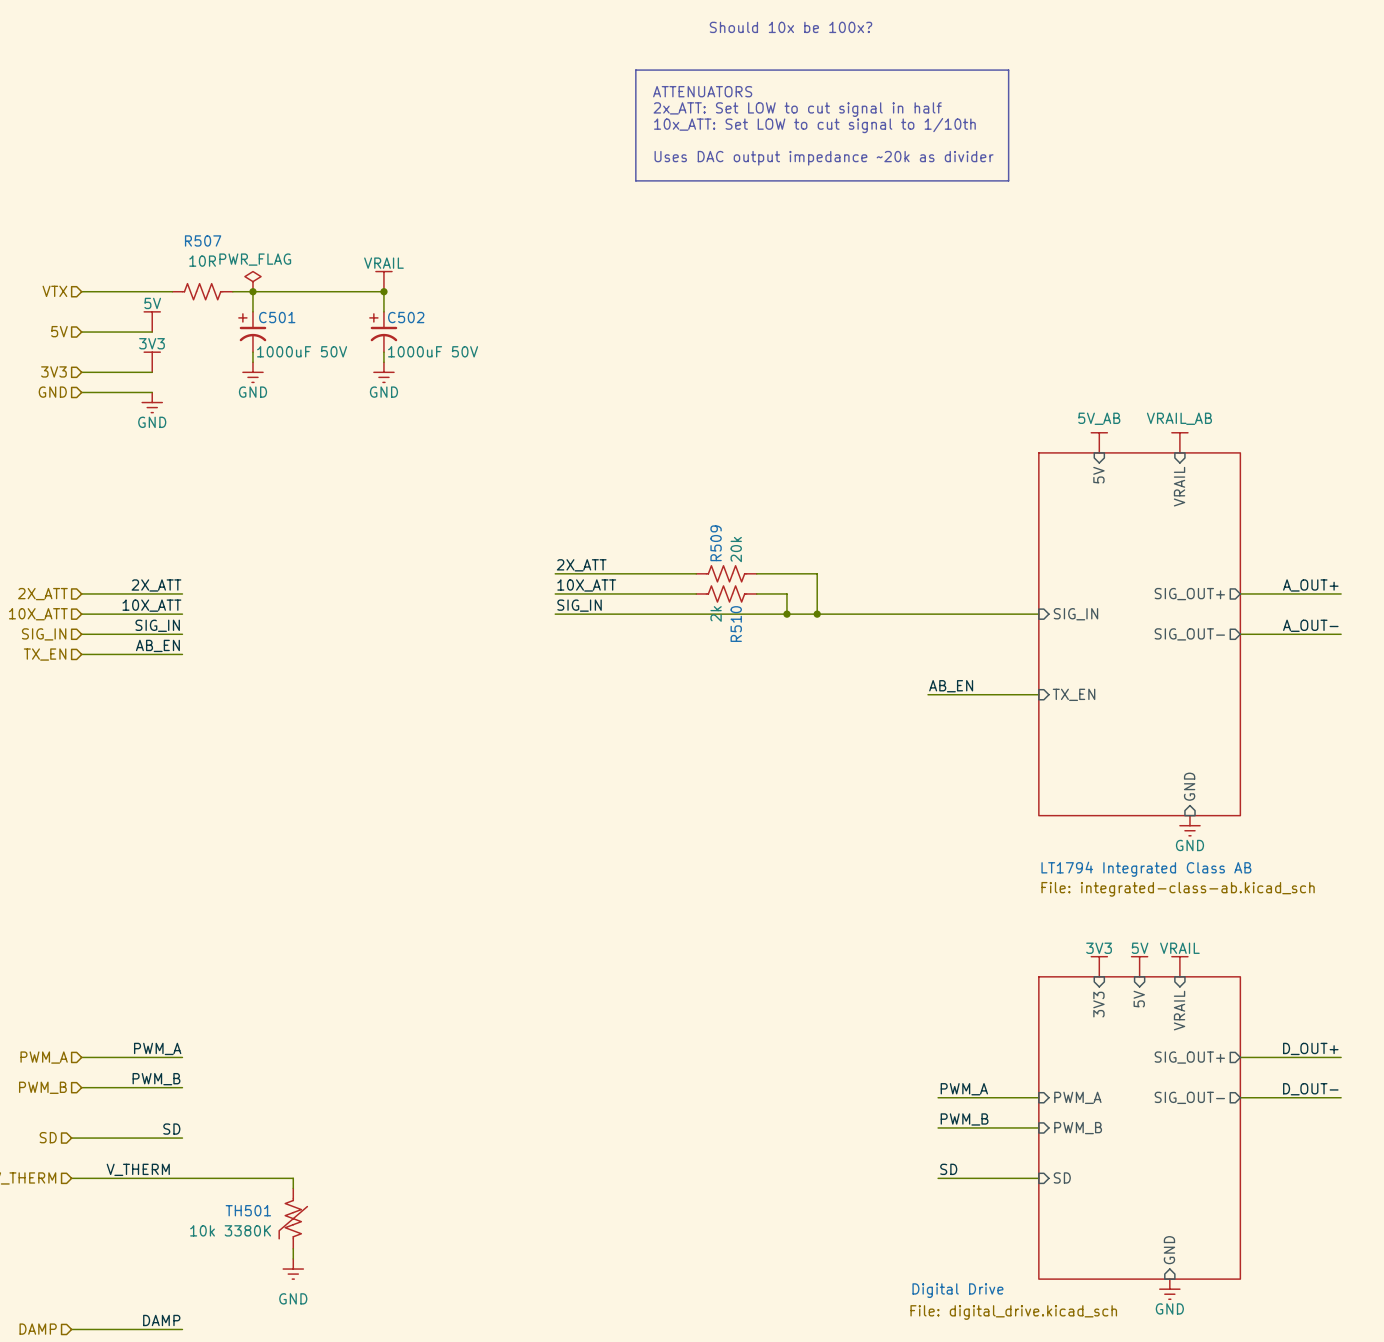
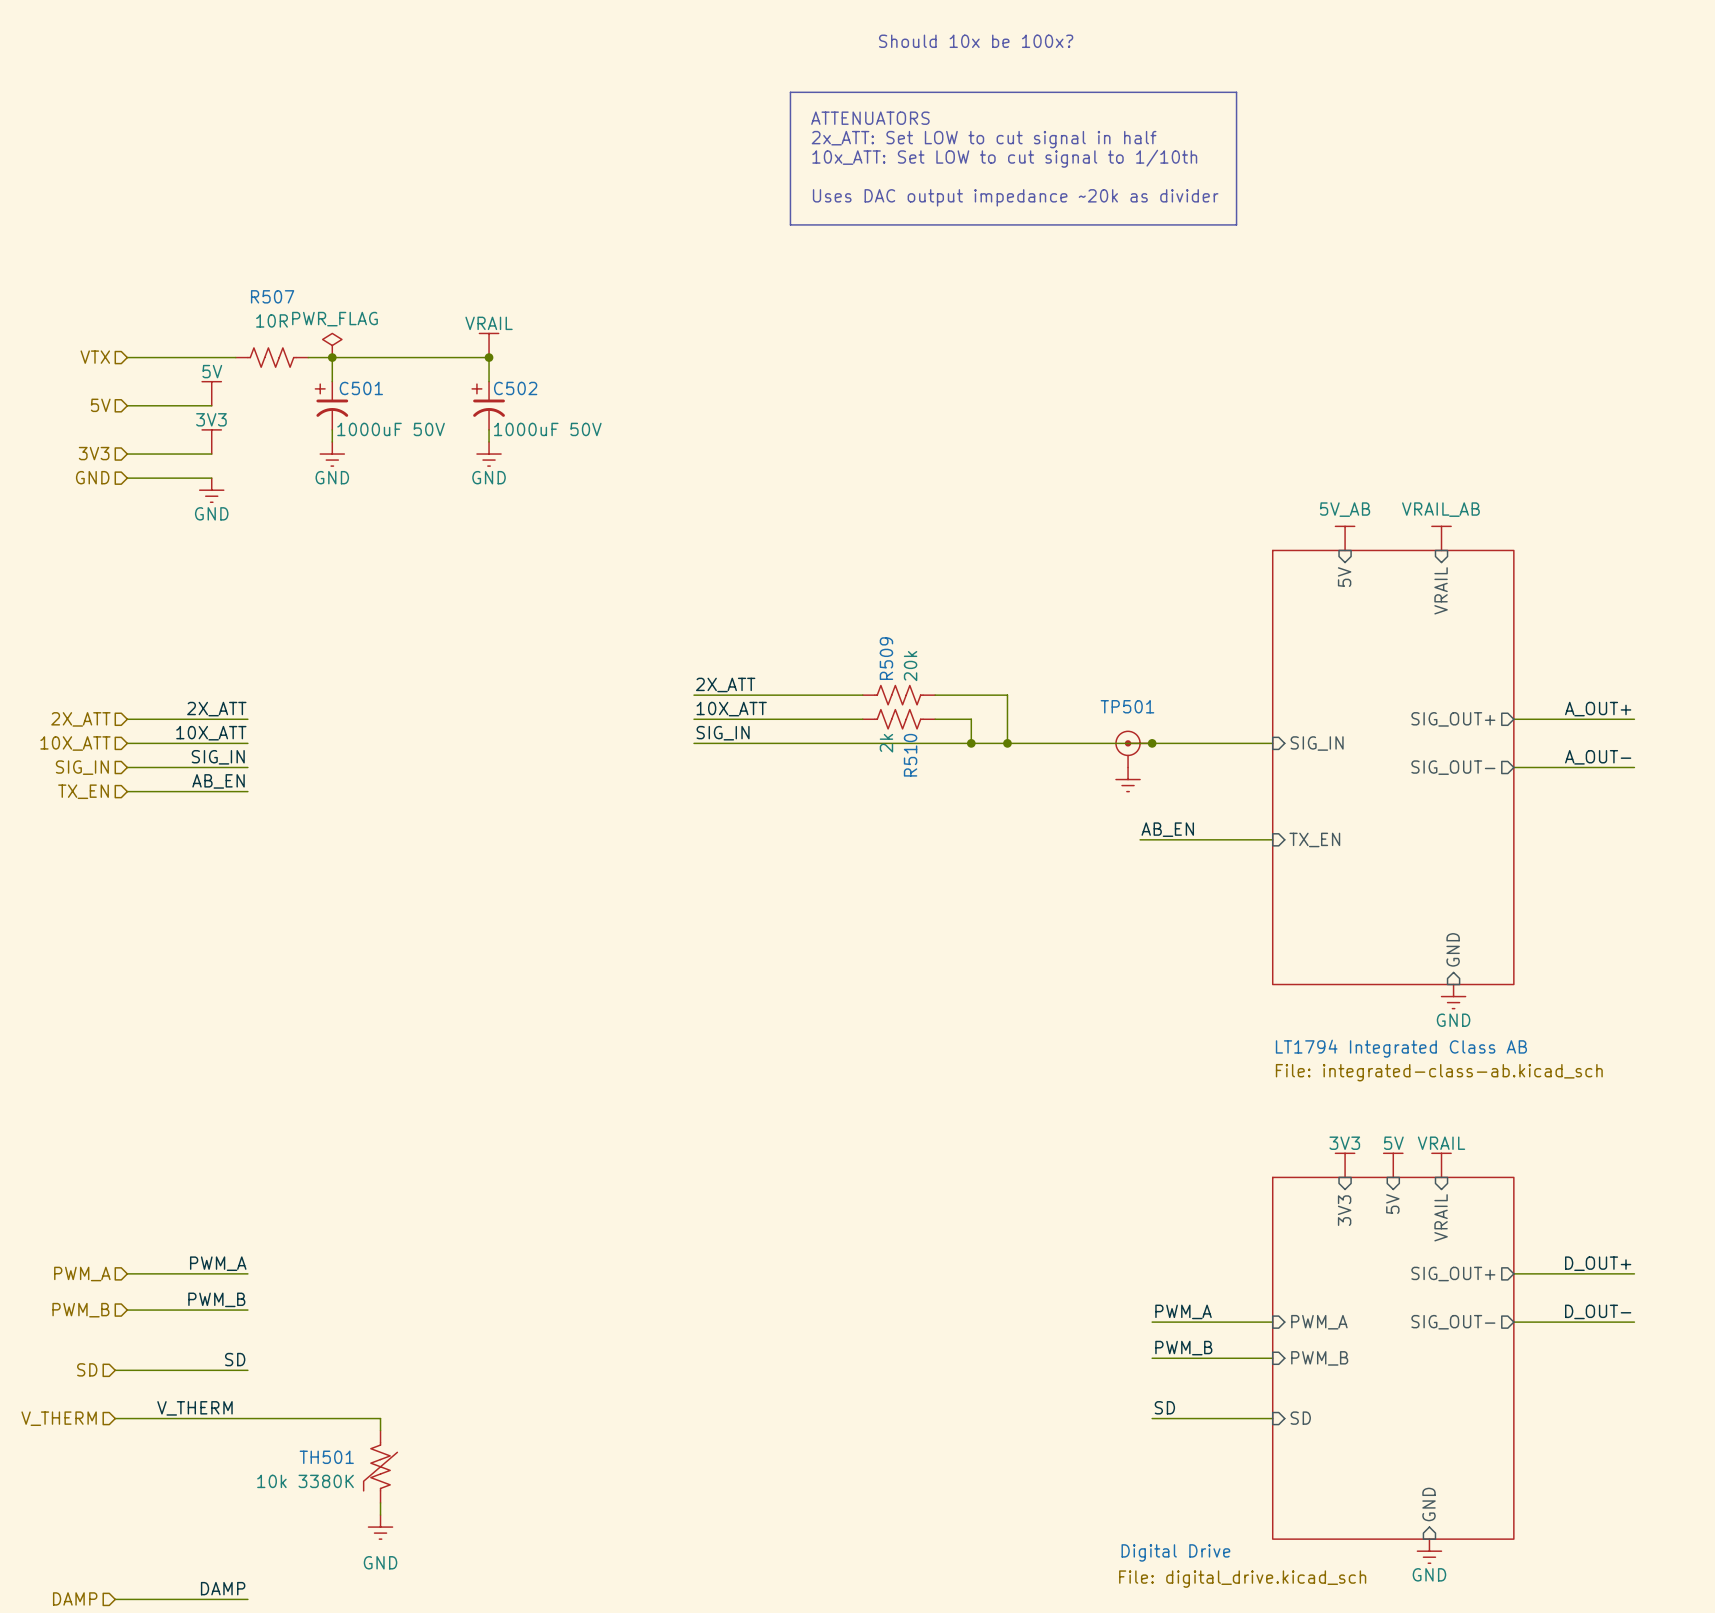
junction: none -> (1152, 743)
TP501: none -> (1134, 749)
power symbol: none -> (1128, 779)

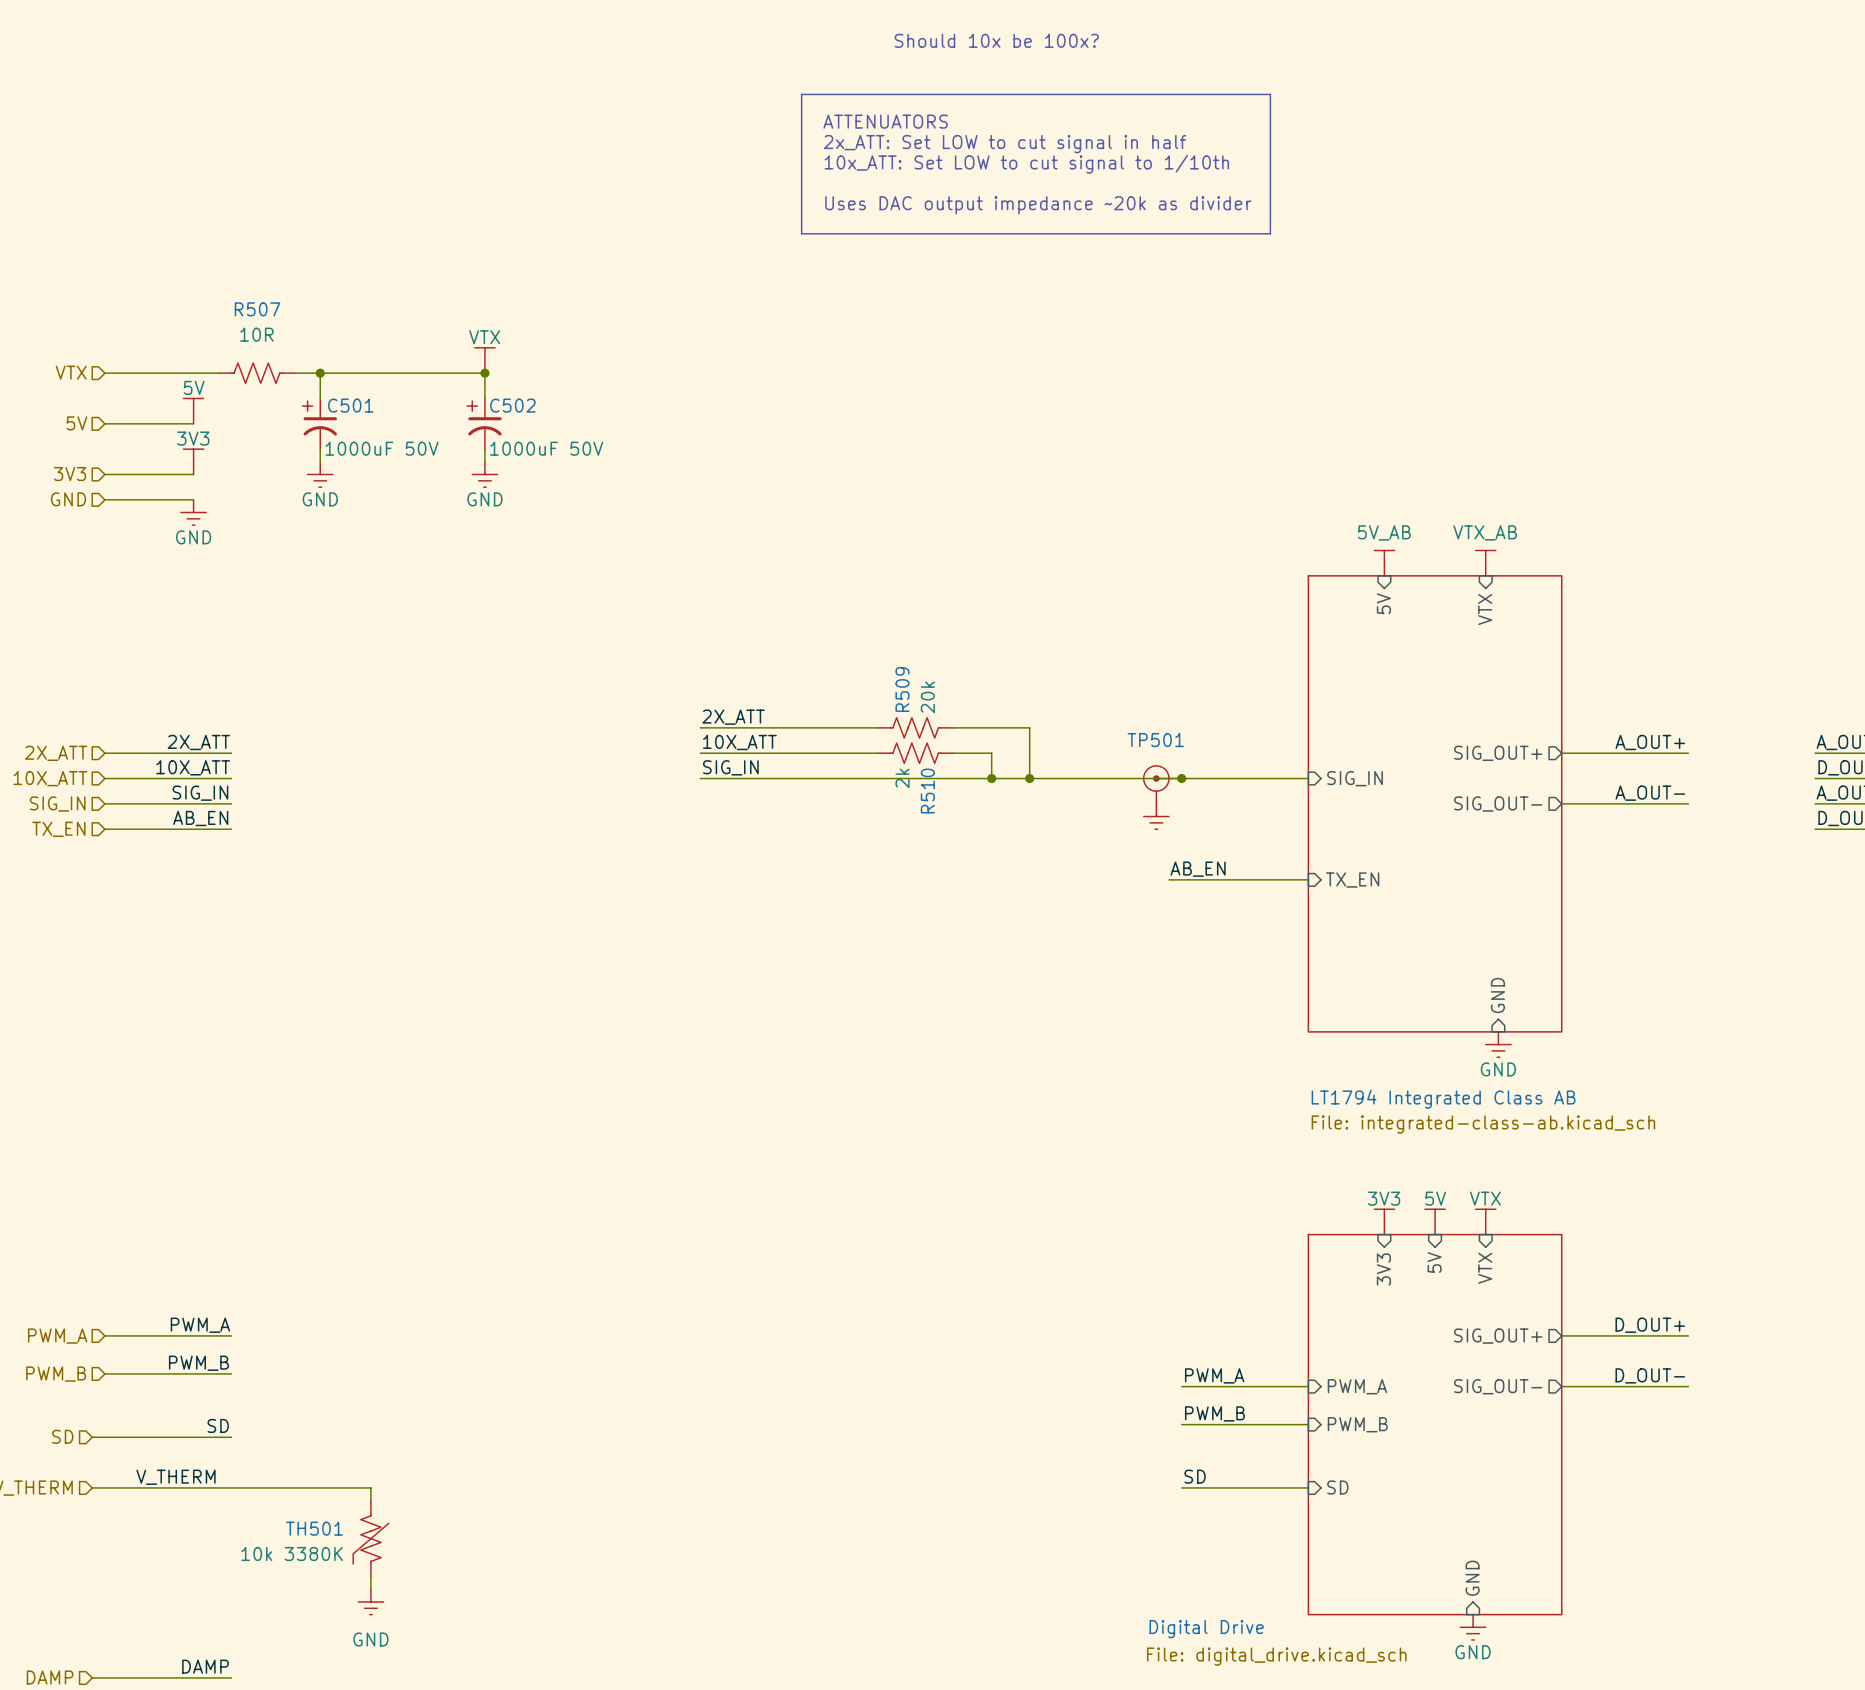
power symbol: PWR_FLAG (332, 345) -> none
power symbol: VRAIL (489, 345) -> VTX (484, 360)
power symbol: VRAIL_AB (1441, 538) -> VTX_AB (1485, 563)
sheet pin: VRAIL (1441, 590) -> VTX (1485, 609)
power symbol: VRAIL (1441, 1165) -> VTX (1485, 1221)
sheet pin: VRAIL (1441, 1217) -> VTX (1485, 1268)

